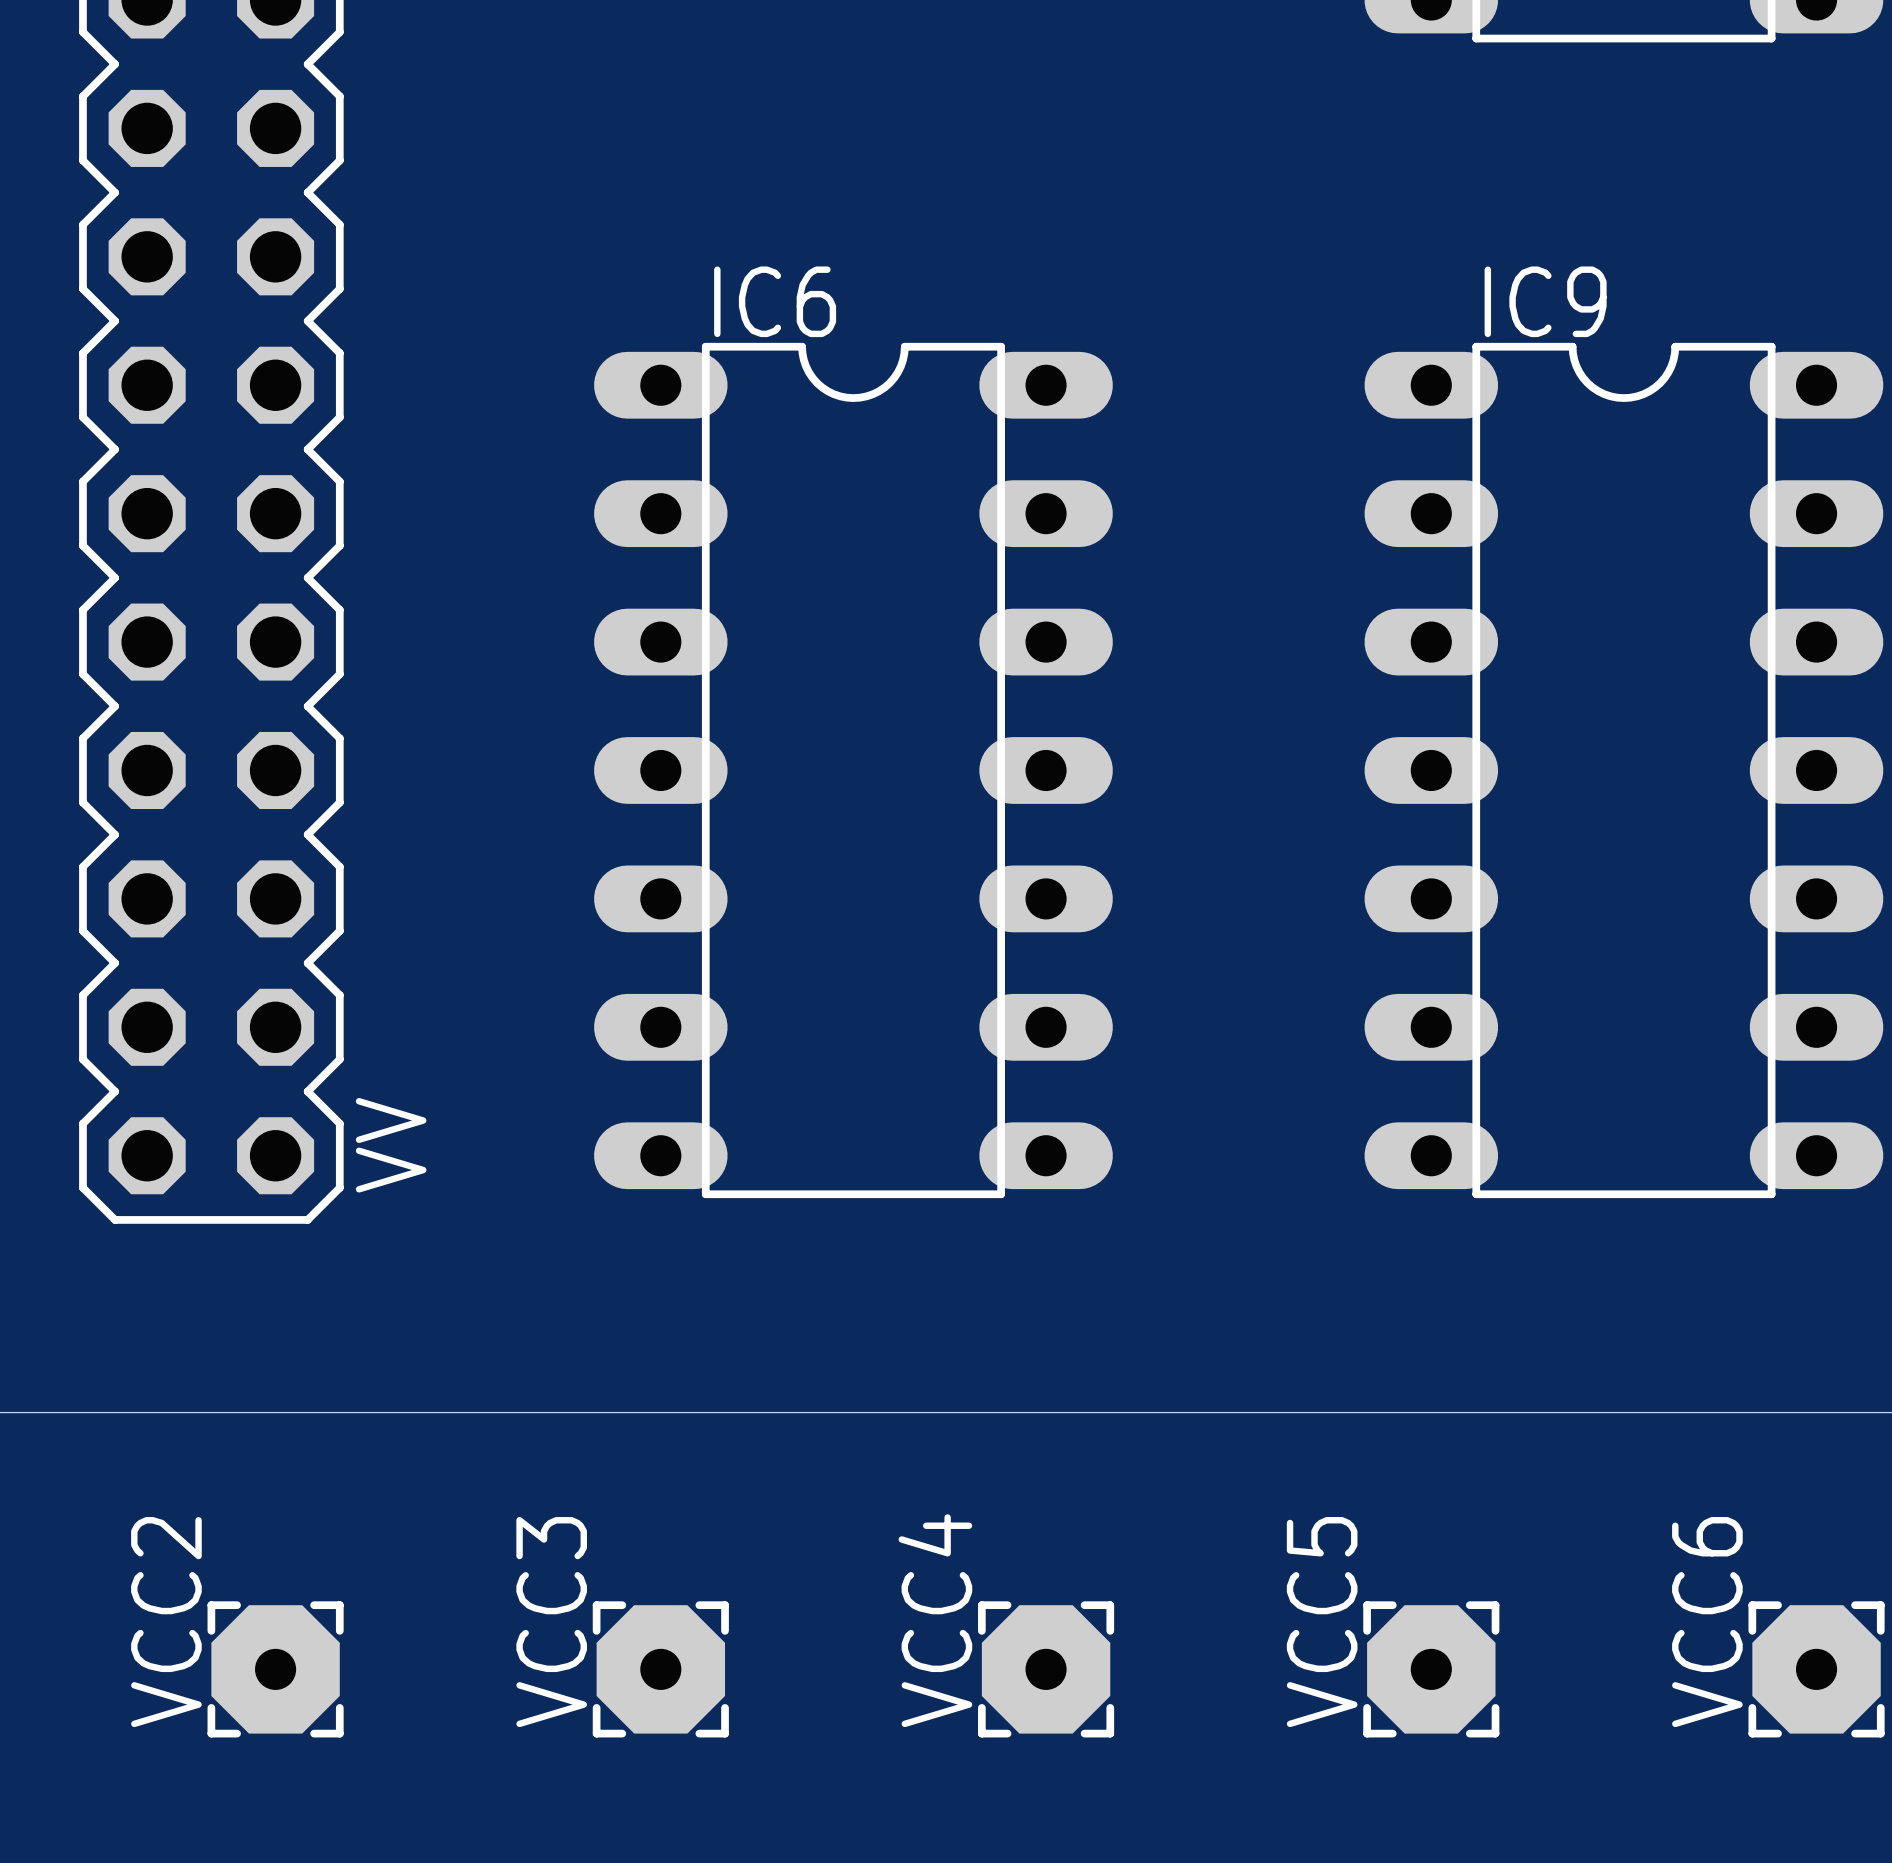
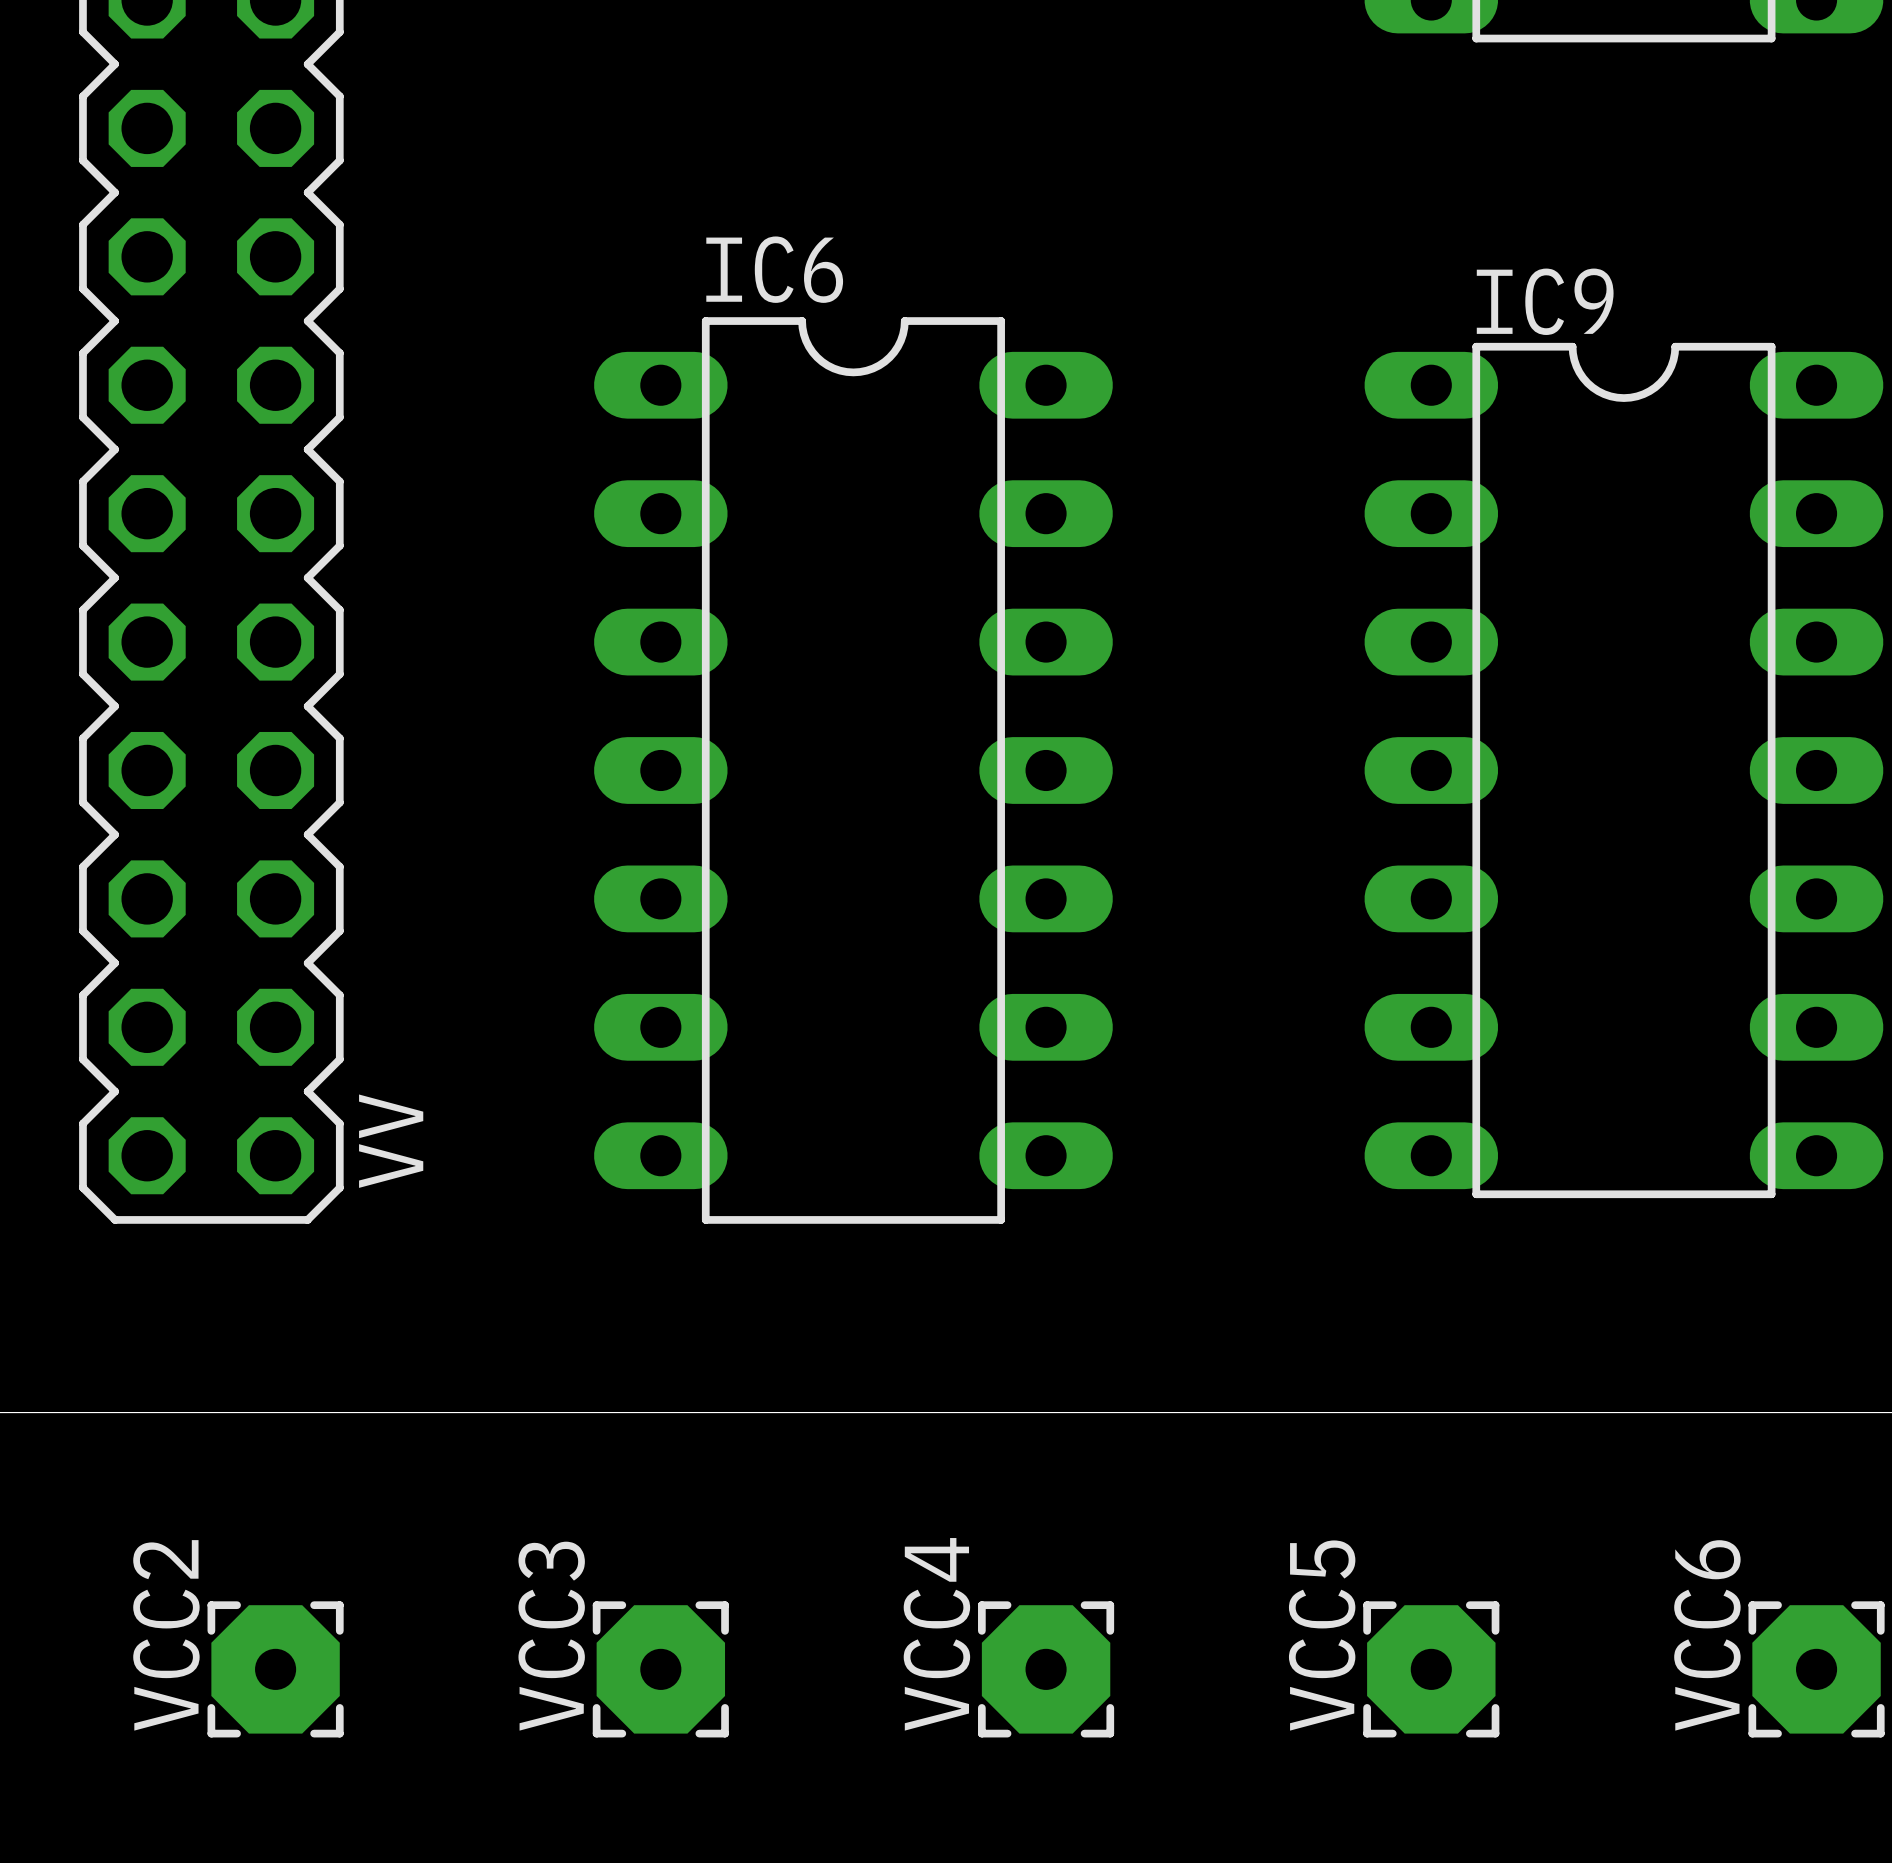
IC6 name position: IC6 (775, 301) -> IC6 (774, 269)
IC6 footprint: [594, 342, 1113, 1199] -> [594, 317, 1113, 1224]

